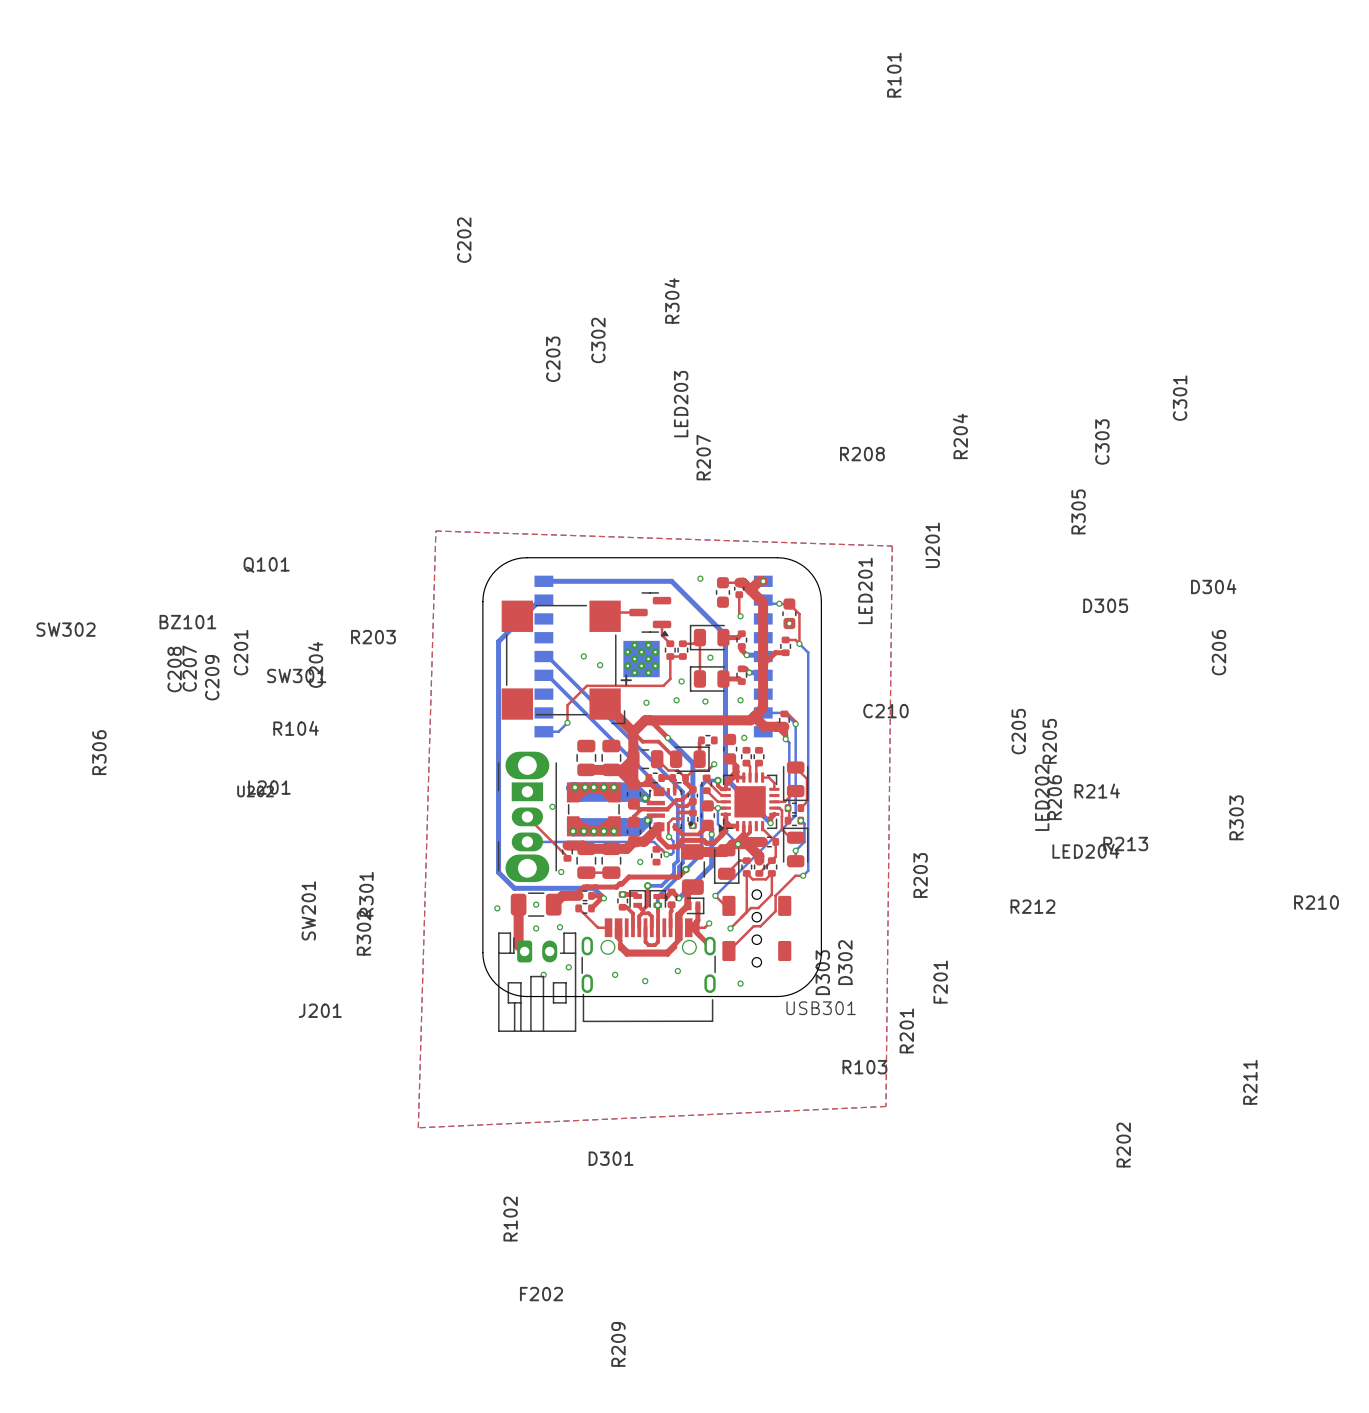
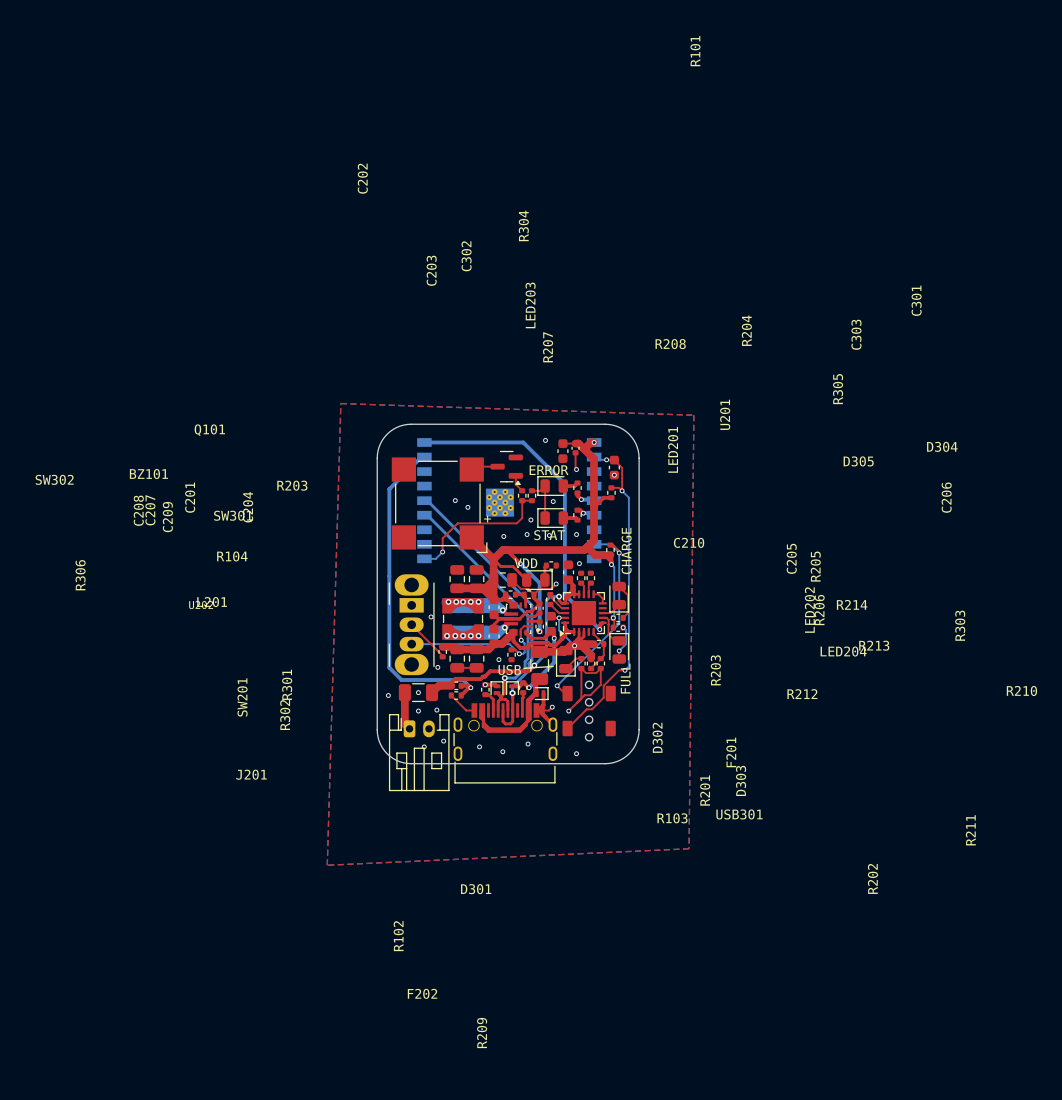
D304 value: none -> ERROR (549, 470)
D305 value: none -> STAT (549, 535)
LED202 value: none -> CHARGE (626, 550)
LED204 value: none -> VDD (525, 563)
line: none -> (553, 666) (524, 668)
LED201 value: none -> USB (509, 669)
LED203 value: none -> FULL (625, 678)
D303 name position: D303 (822, 972) -> D303 (741, 780)
USB301 name position: USB301 (821, 1008) -> USB301 (739, 814)

